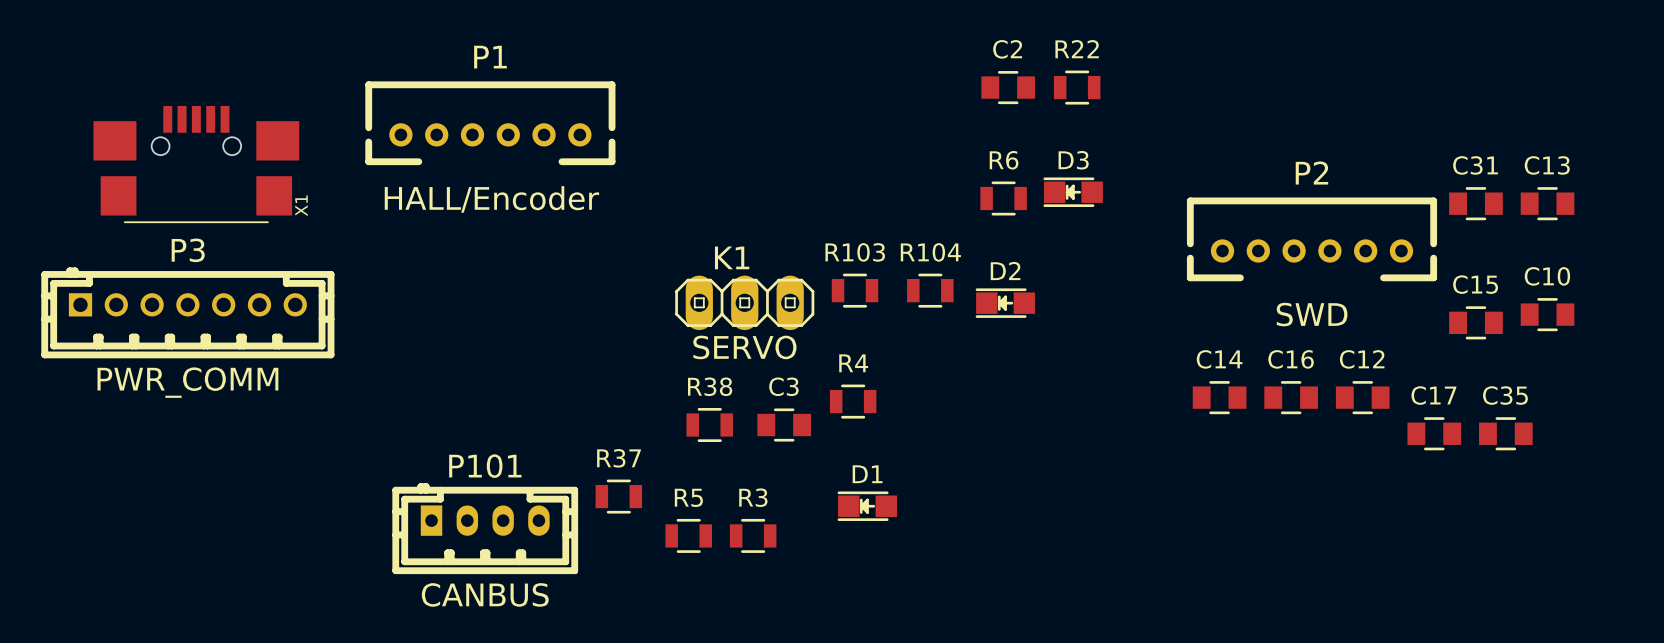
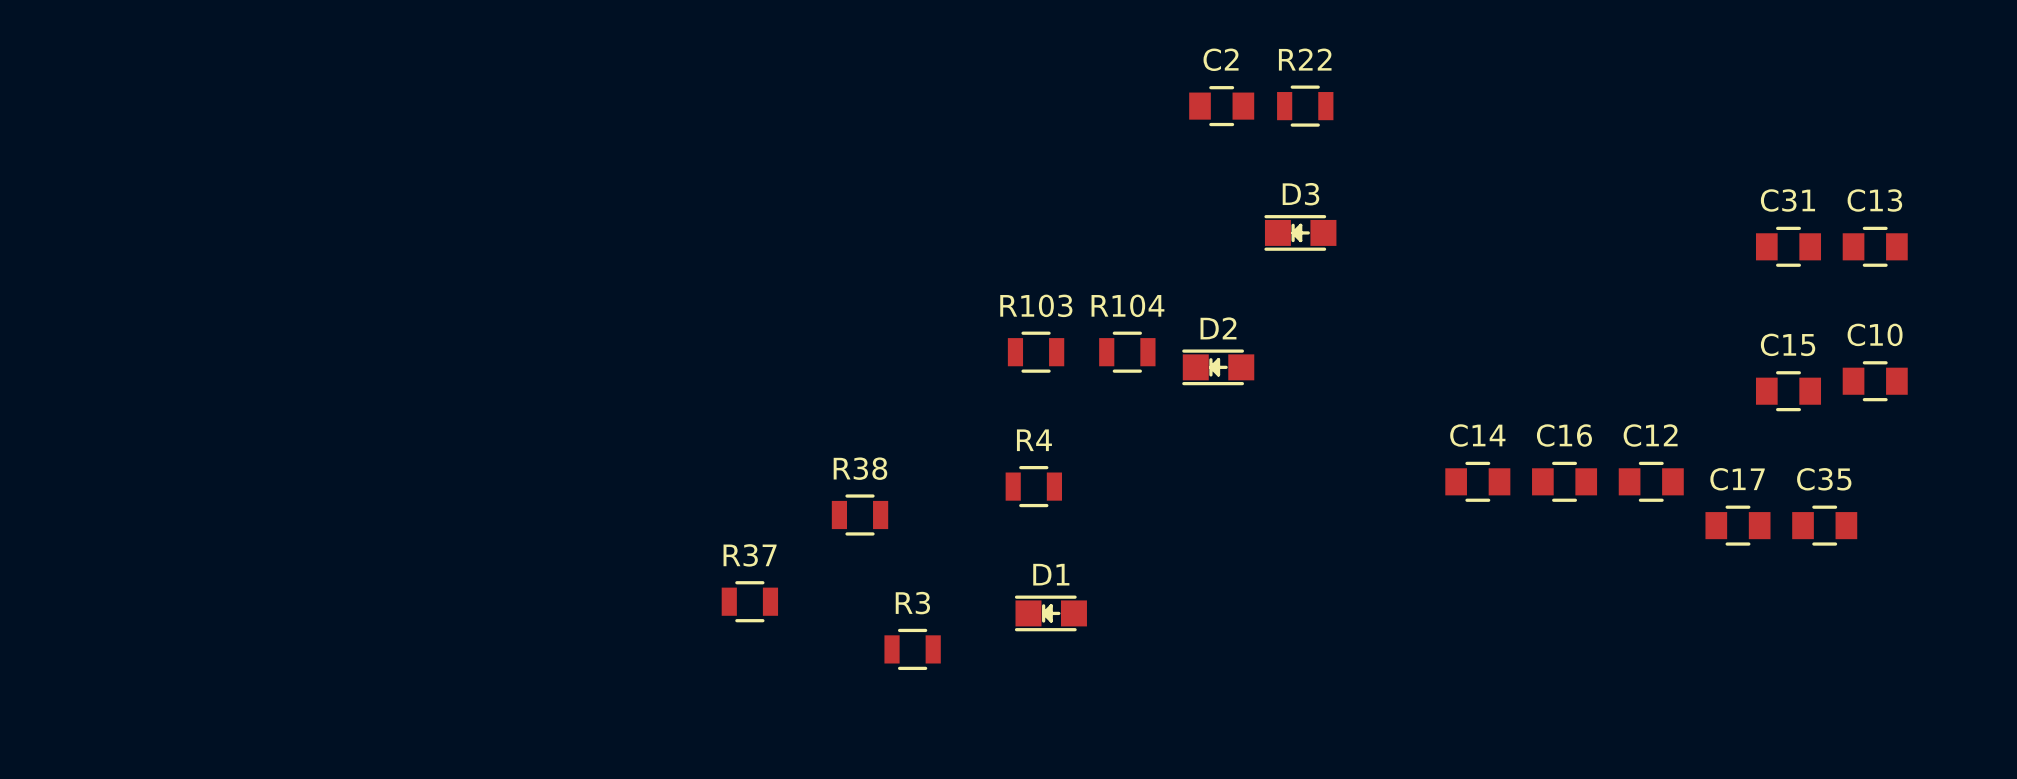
P1: HALL/Encoder (490, 123) -> none
X1: (196, 164) -> none
R6: (1003, 198) -> none
P2: SWD (1311, 239) -> none
K1: SERVO (744, 302) -> none
P3: PWR_COMM (187, 312) -> none
C3: (784, 425) -> none
P101: CANBUS (485, 528) -> none
R5: (688, 535) -> none

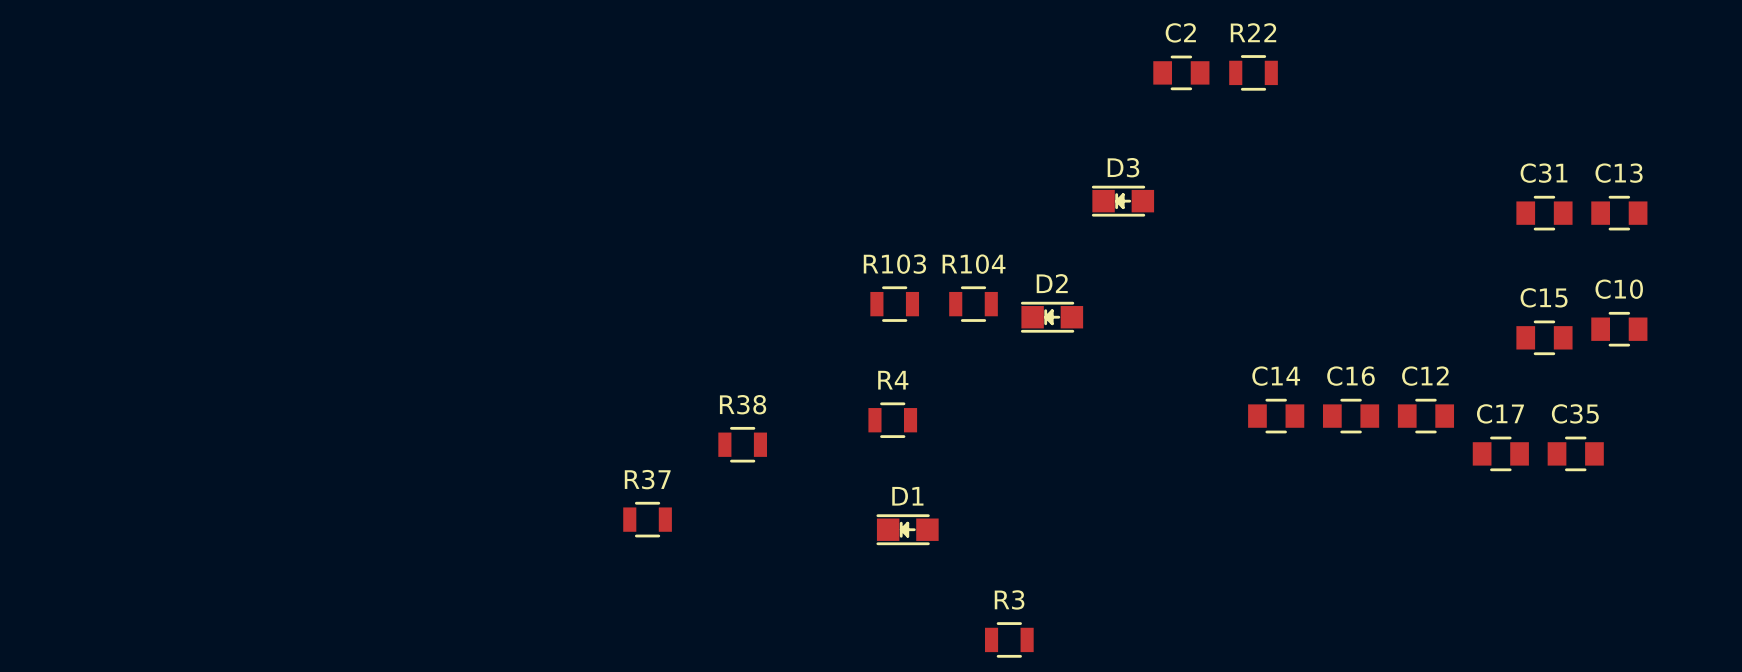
C2 position: (1221, 106) -> (1181, 72)
R22 position: (1305, 106) -> (1253, 72)
R3 position: (912, 649) -> (1009, 639)

